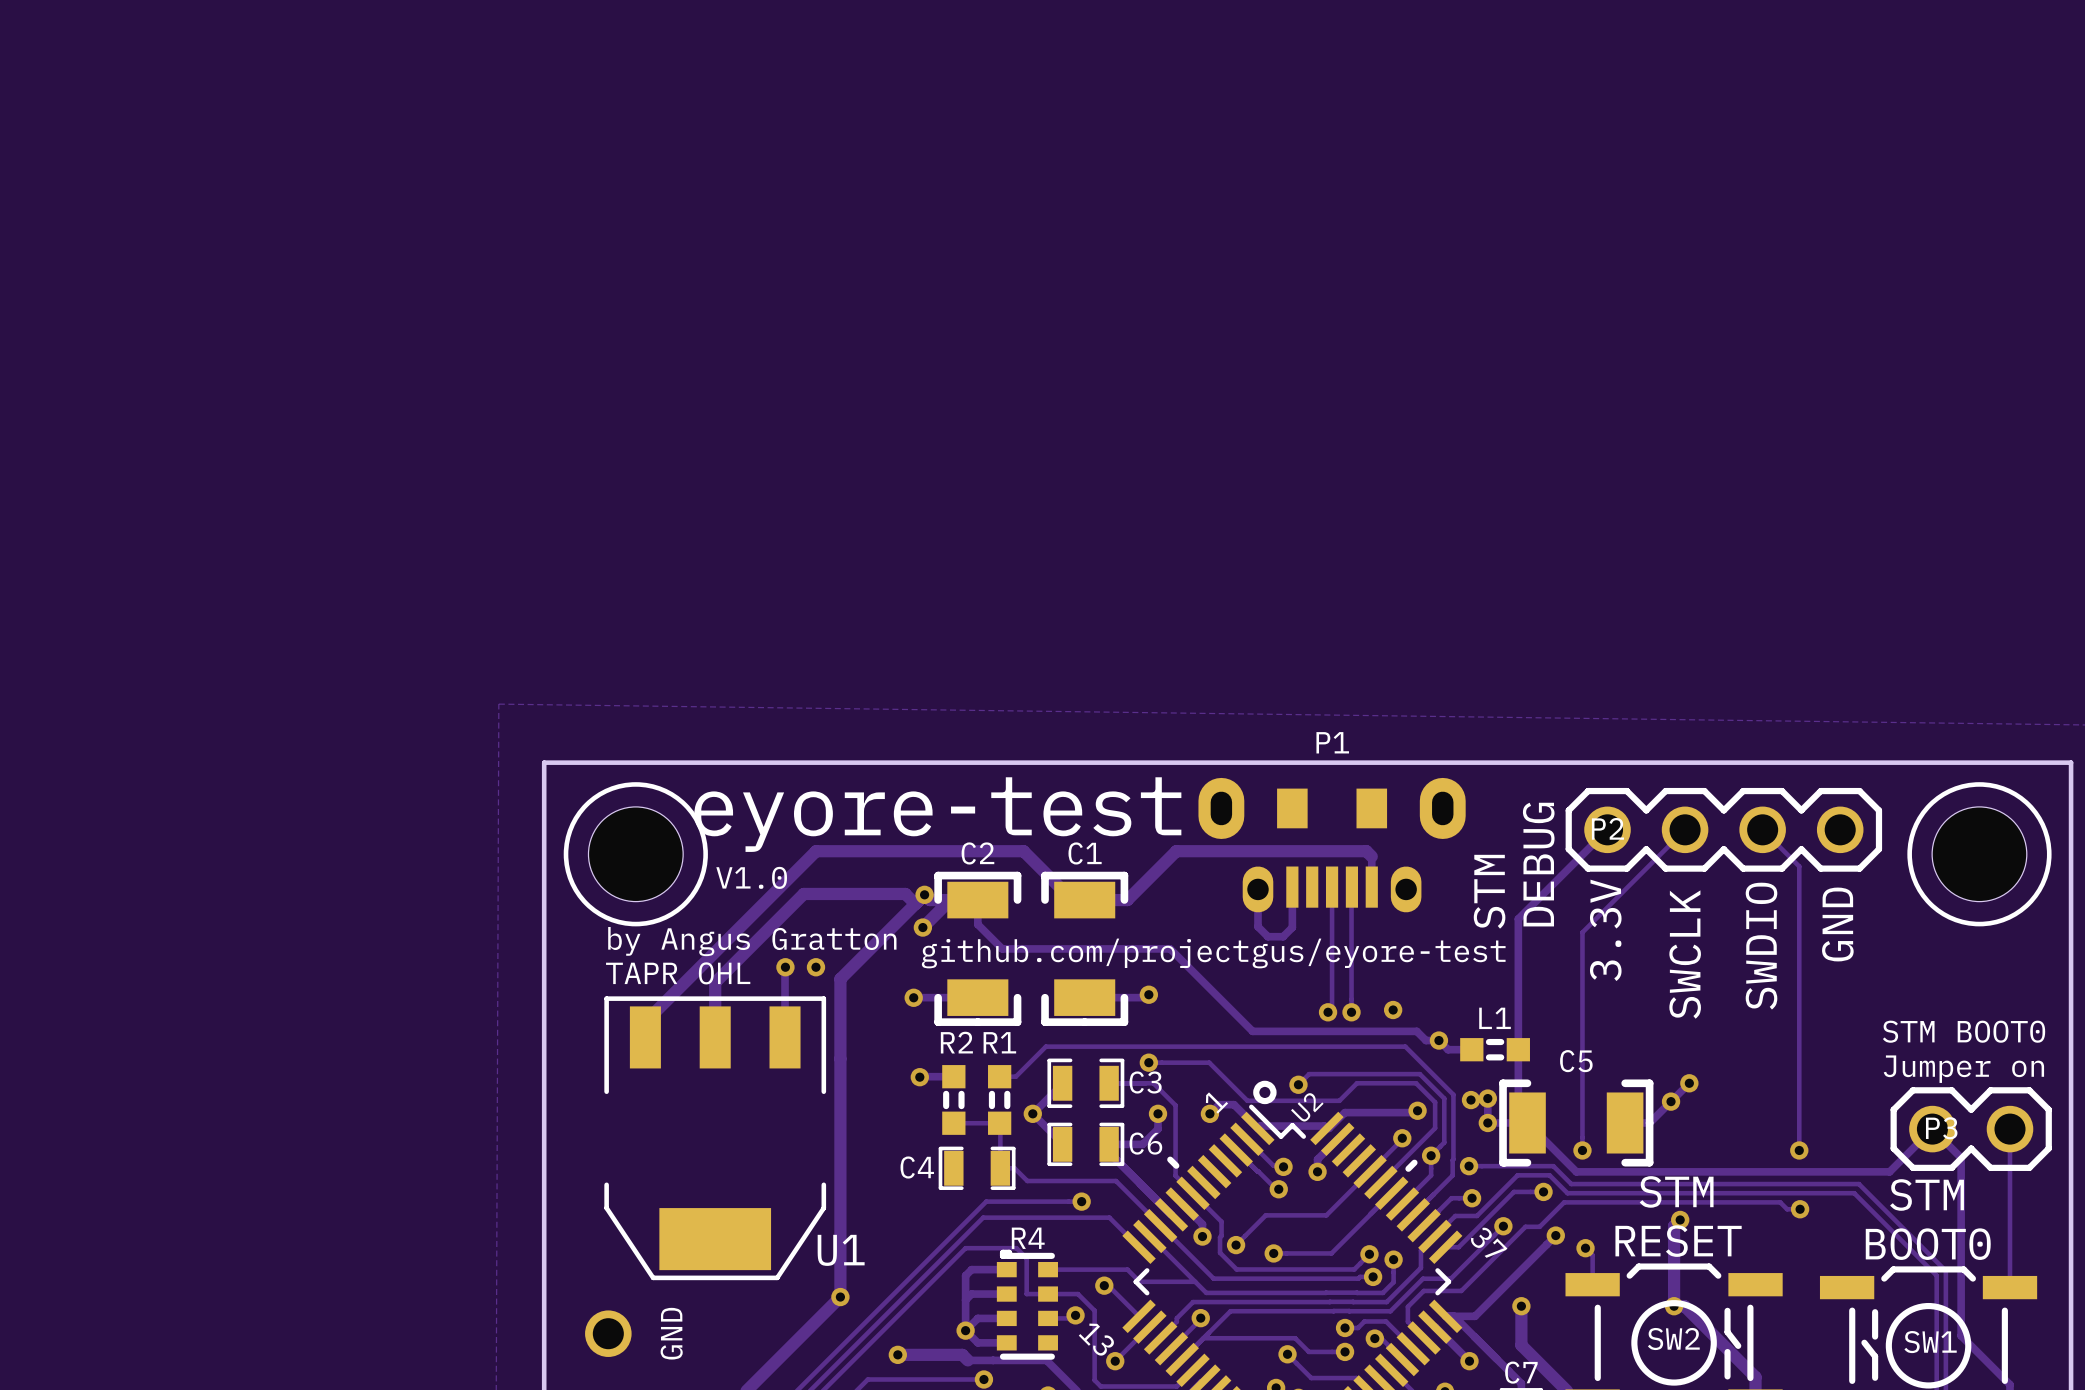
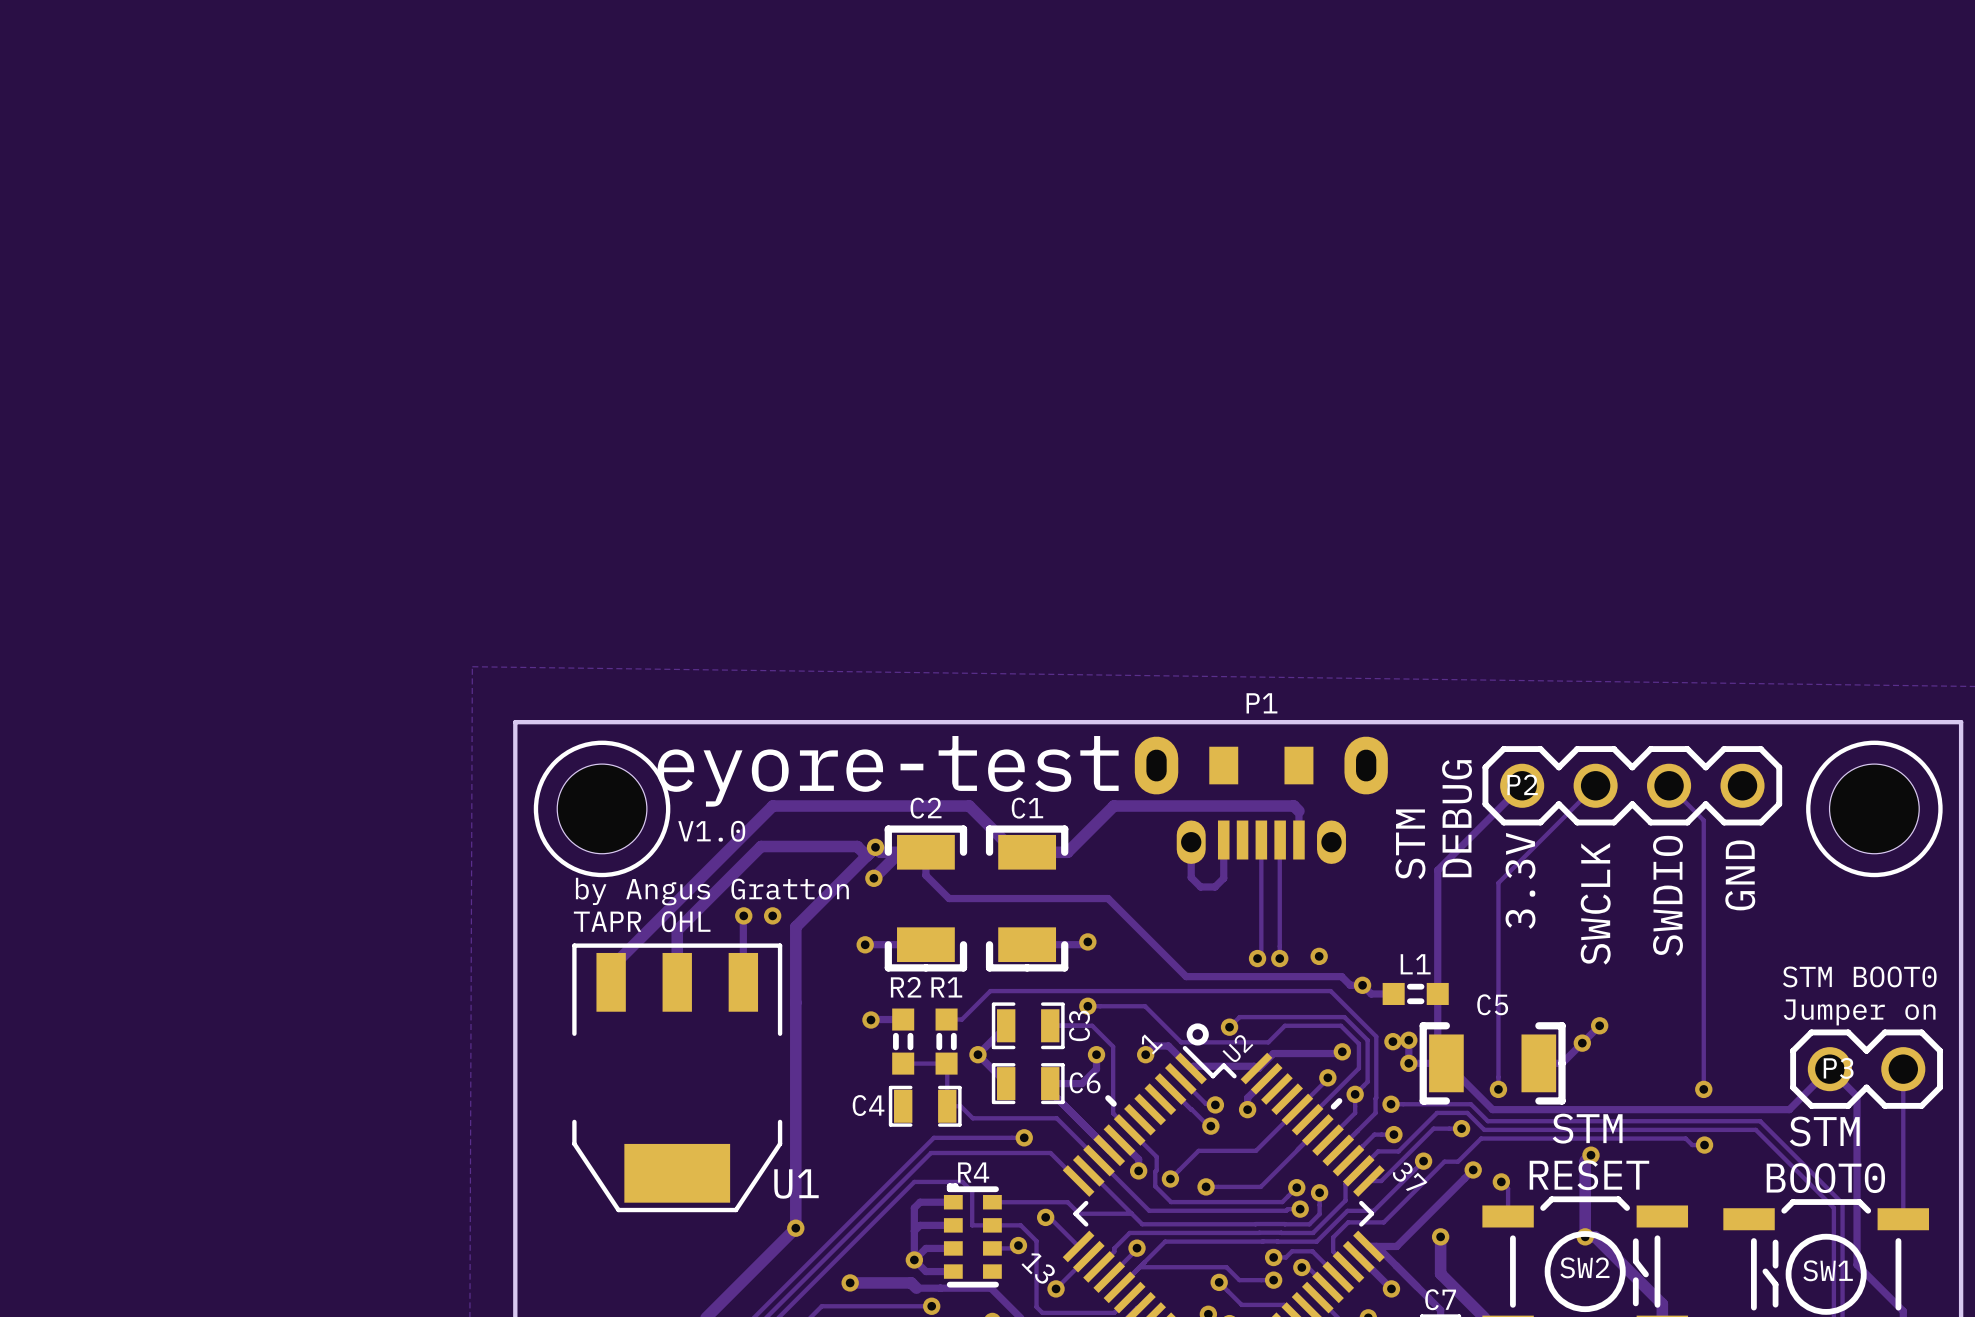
text: github.com/projectgus/eyore-test (1213, 953) -> none
C3 name rotation: 0° (1145, 1082) -> 90° counterclockwise (1079, 1025)
part: (608, 1333) -> none
text: GND (671, 1333) -> none

